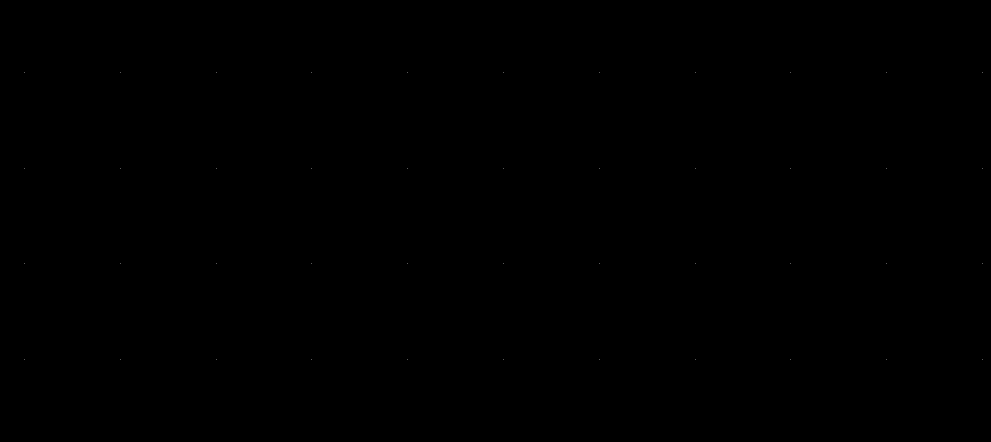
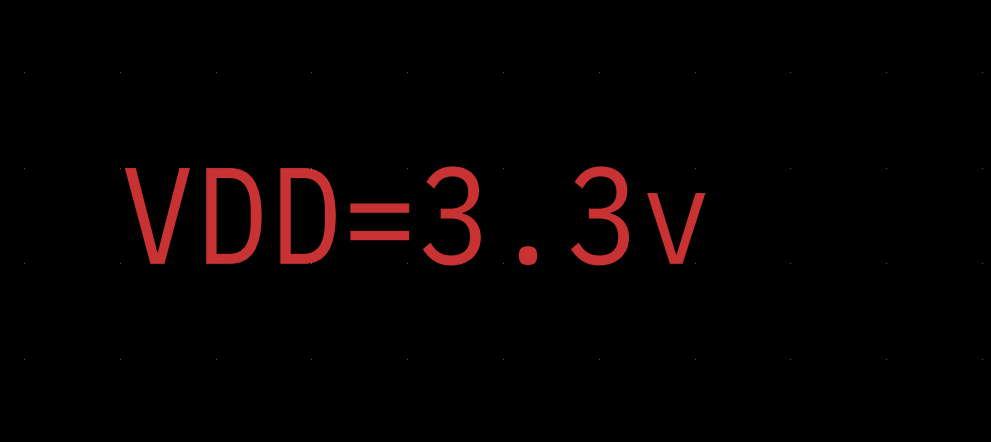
text: none -> VDD=3.3v (415, 215)

